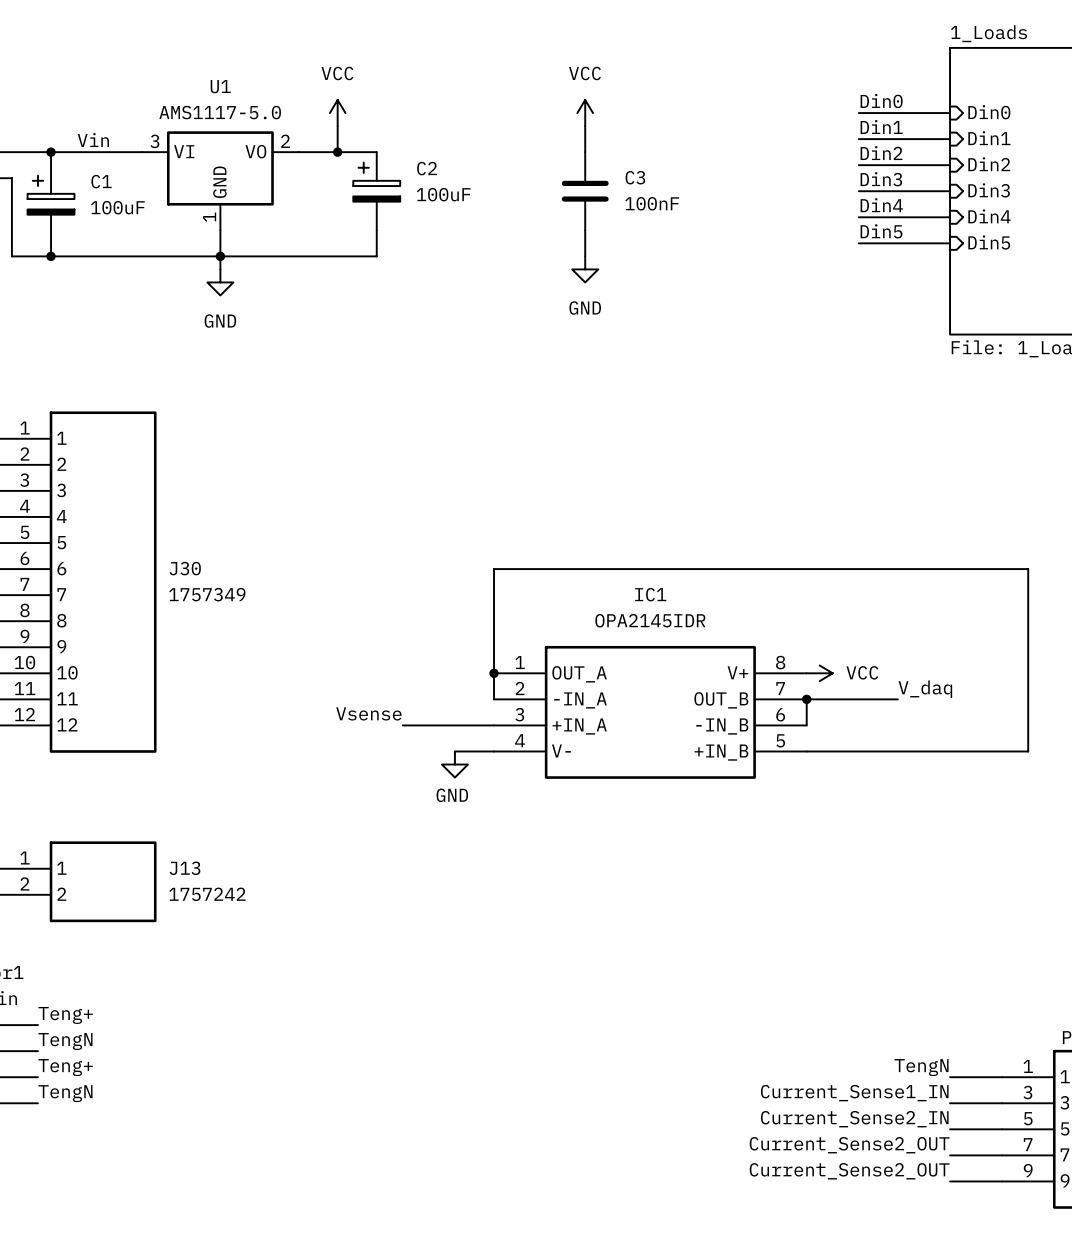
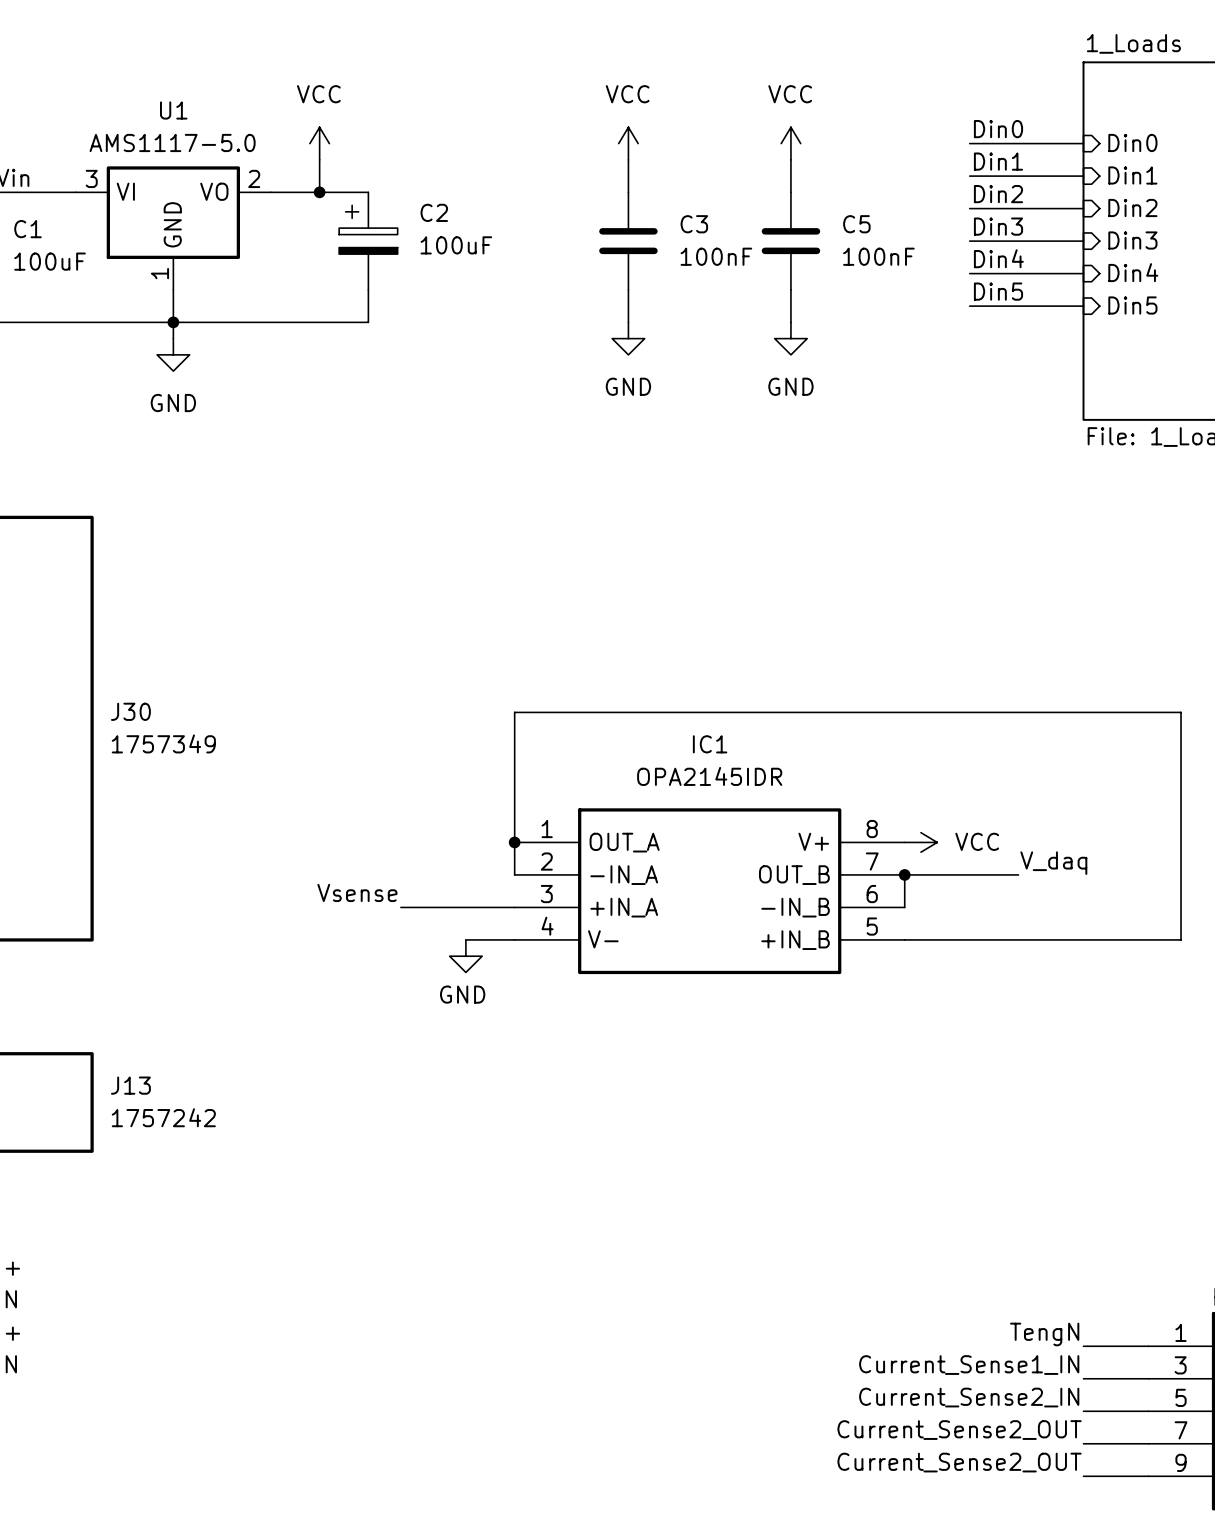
power symbol: none -> VCC (790, 143)
wire: none -> (790, 159) (790, 192)
C5: none -> 100nF (790, 241)
wire: none -> (790, 289) (790, 322)
power symbol: none -> GND (790, 338)

